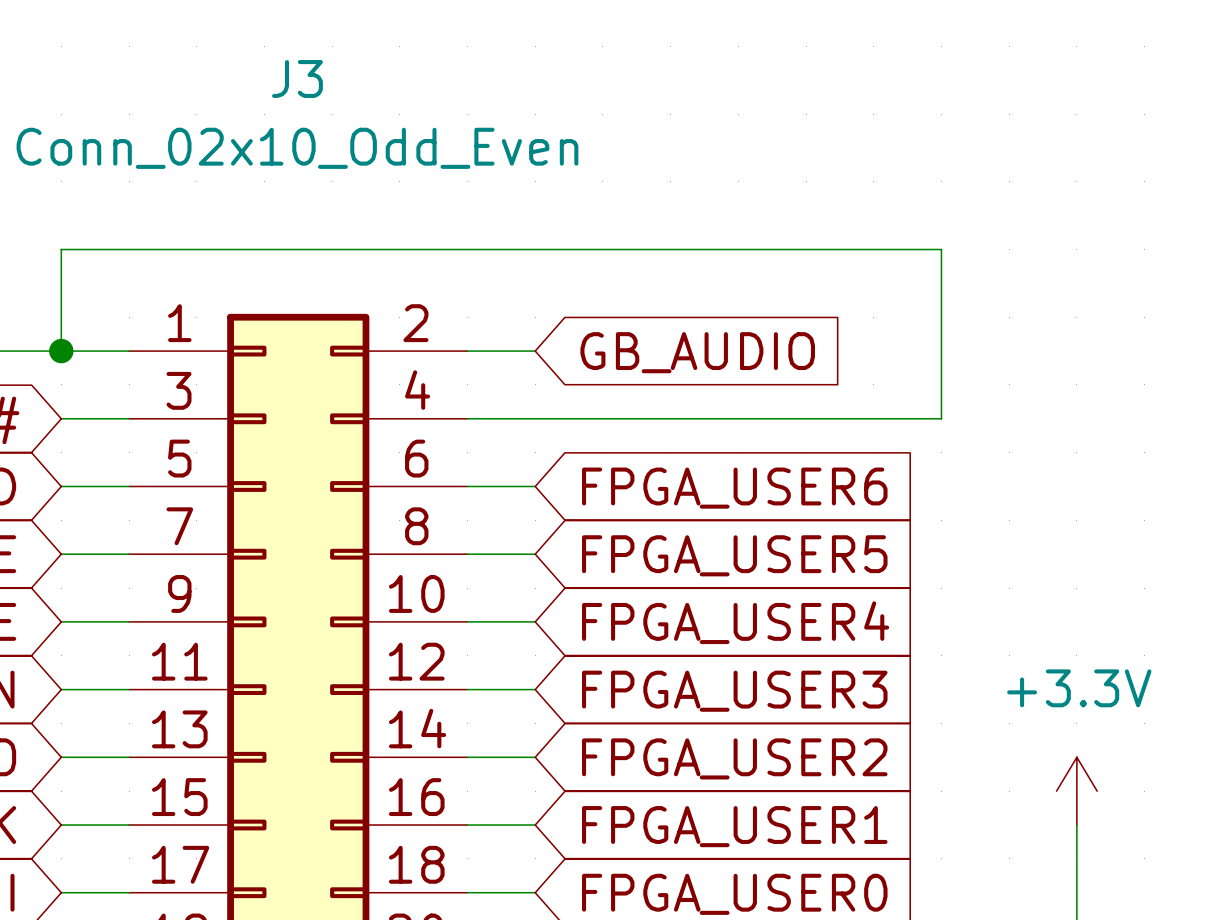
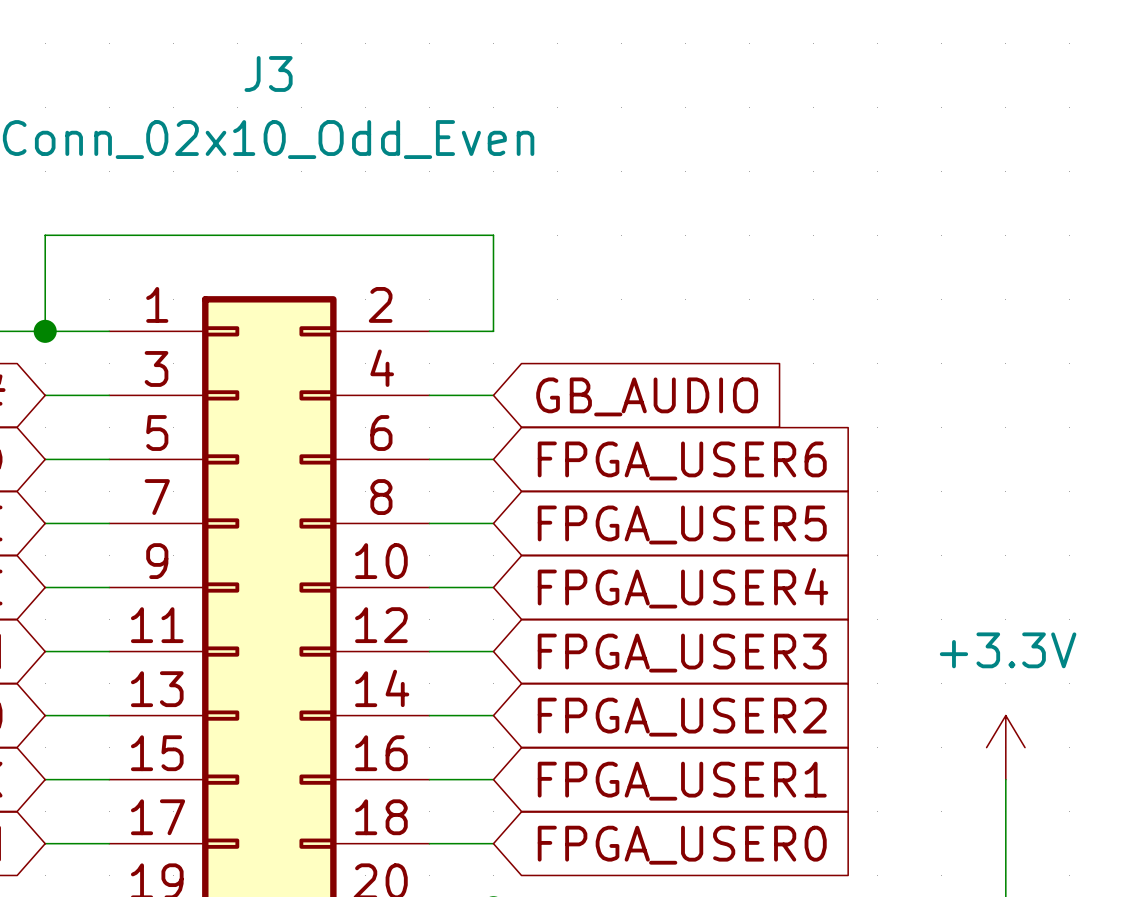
wire: (535, 249) (941, 249) (941, 418) (535, 418) -> (493, 235) (493, 331)
global label position: GB_AUDIO (697, 352) -> GB_AUDIO (647, 396)

